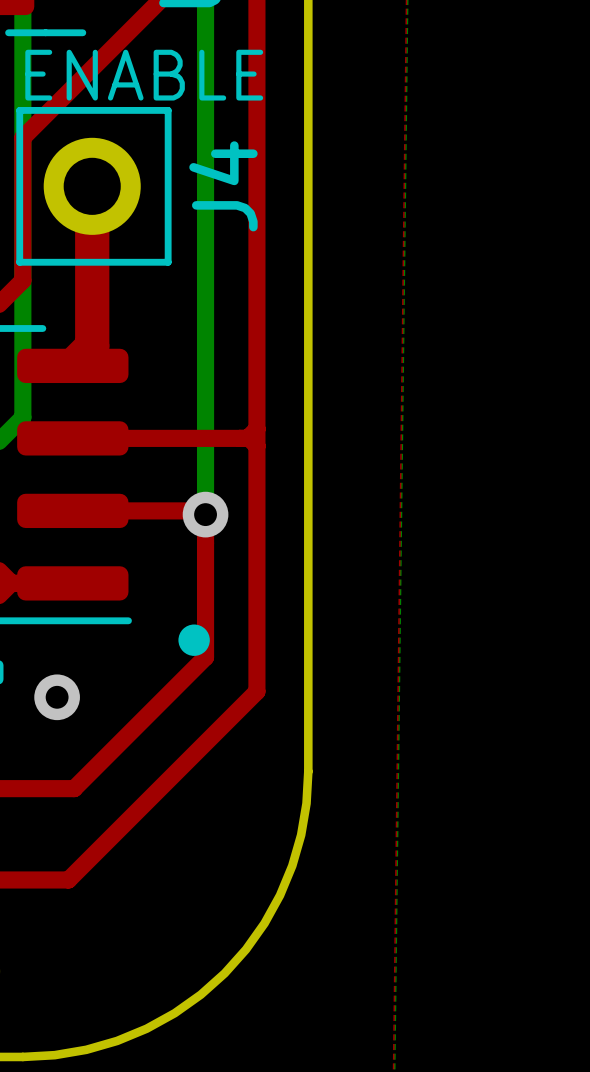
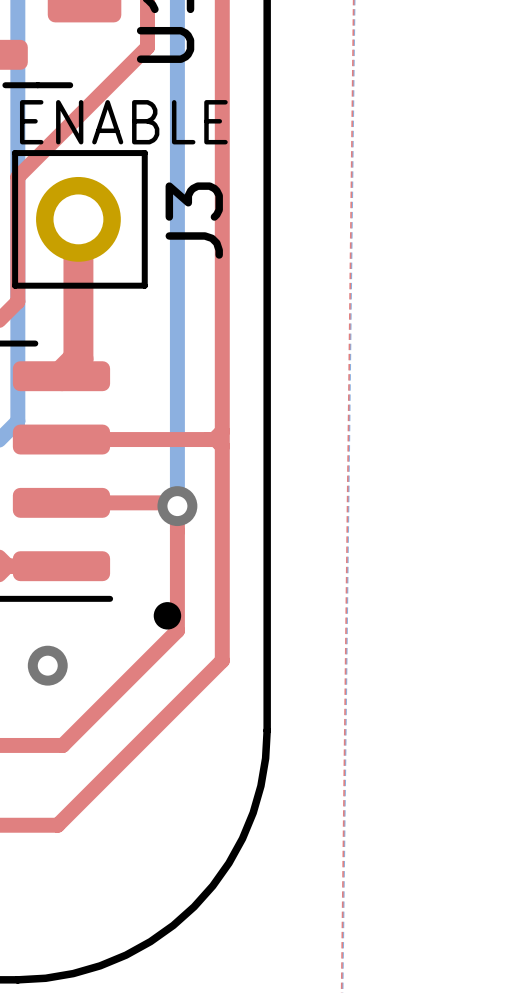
J4 name: J4 (223, 186) -> J3 (194, 220)

